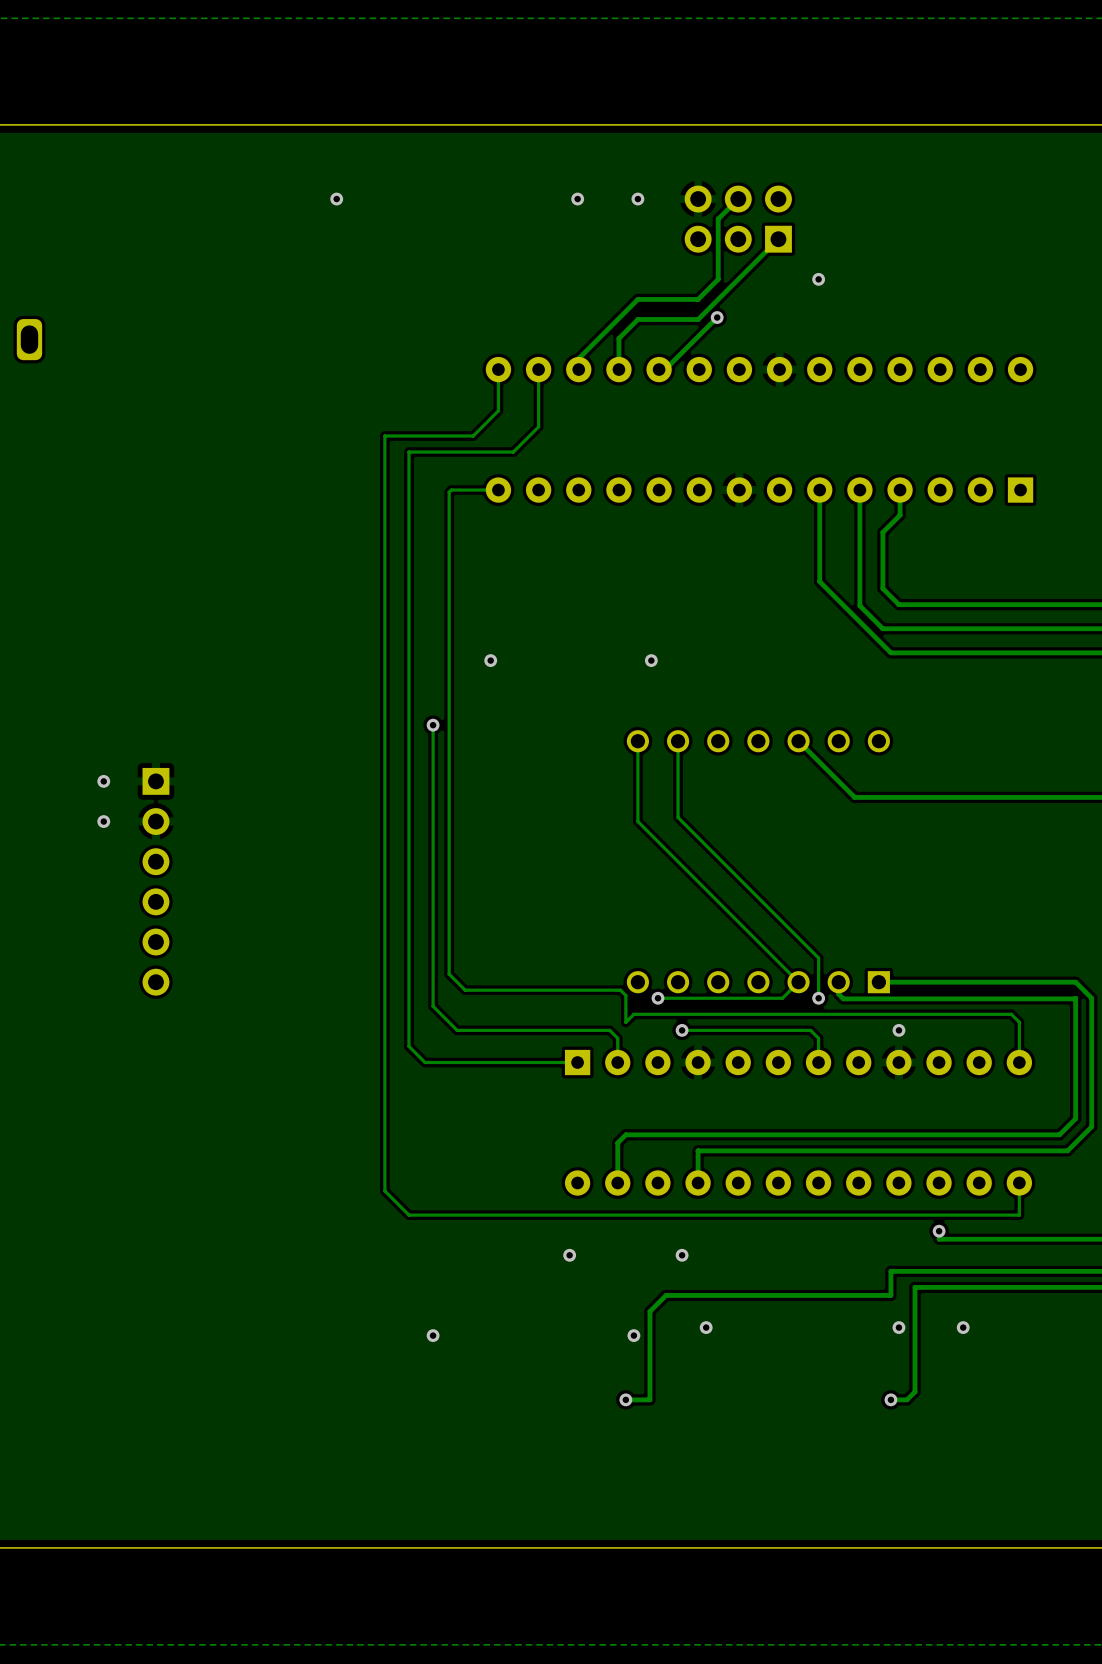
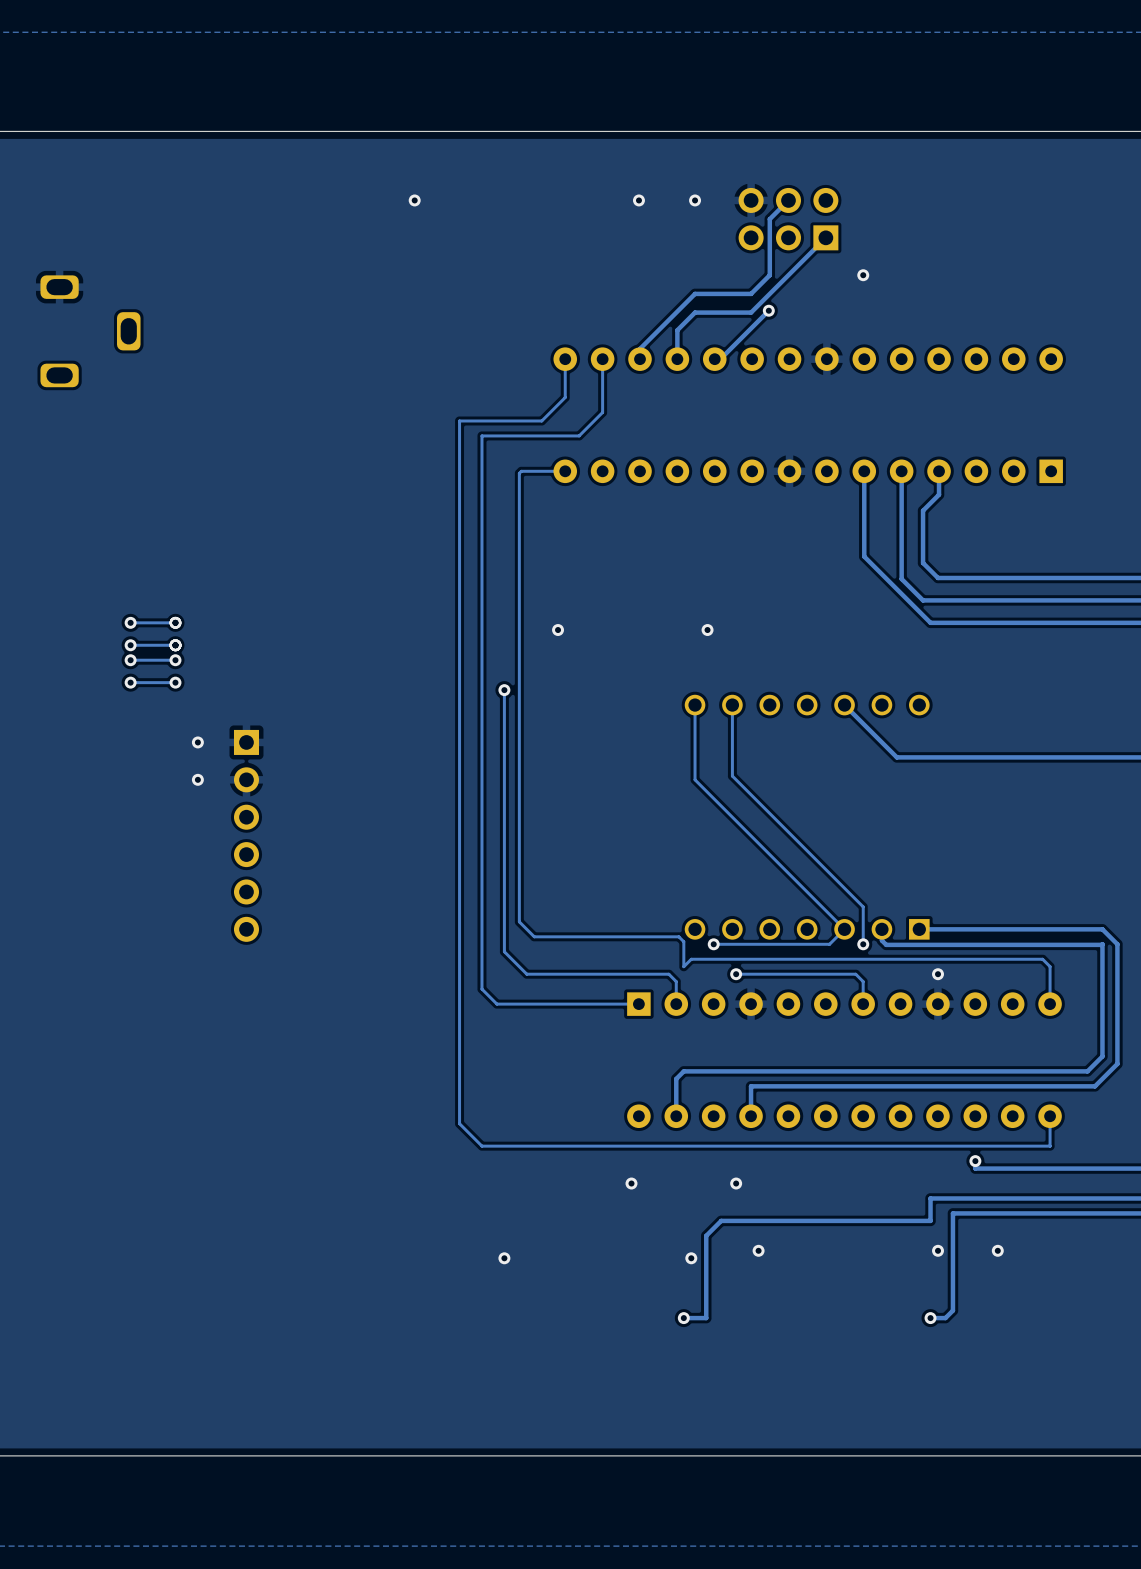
via: none -> (130, 622)
track: none -> (175, 622) (130, 622)
via: none -> (175, 622)
via: none -> (130, 645)
track: none -> (175, 645) (130, 645)
via: none -> (175, 645)
via: none -> (130, 660)
track: none -> (175, 660) (130, 660)
via: none -> (175, 660)
via: none -> (130, 682)
track: none -> (175, 682) (130, 682)
via: none -> (175, 682)

